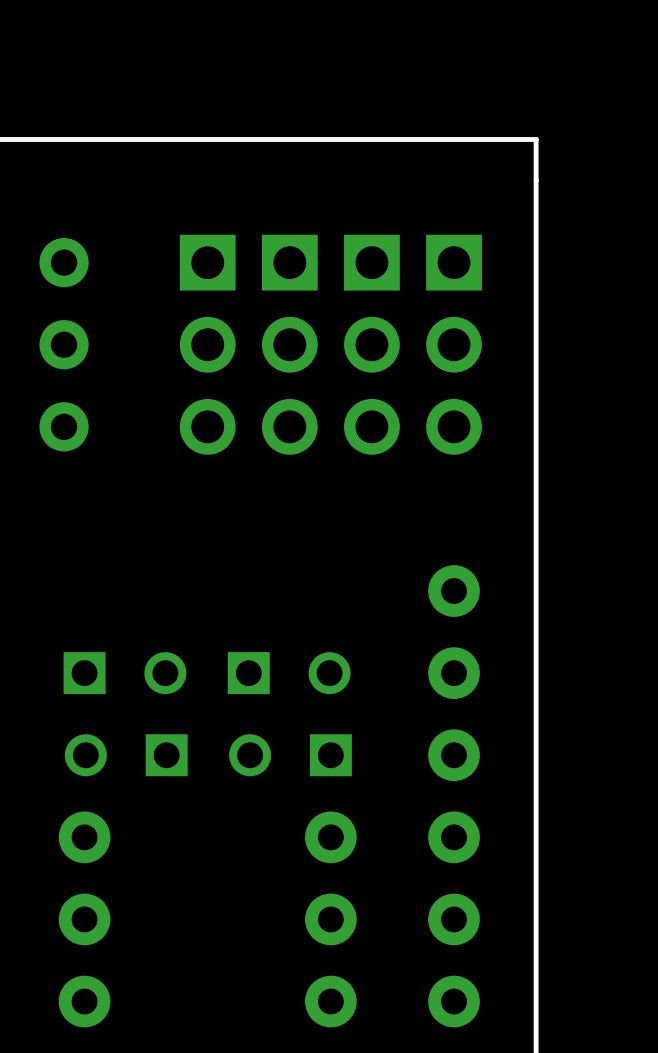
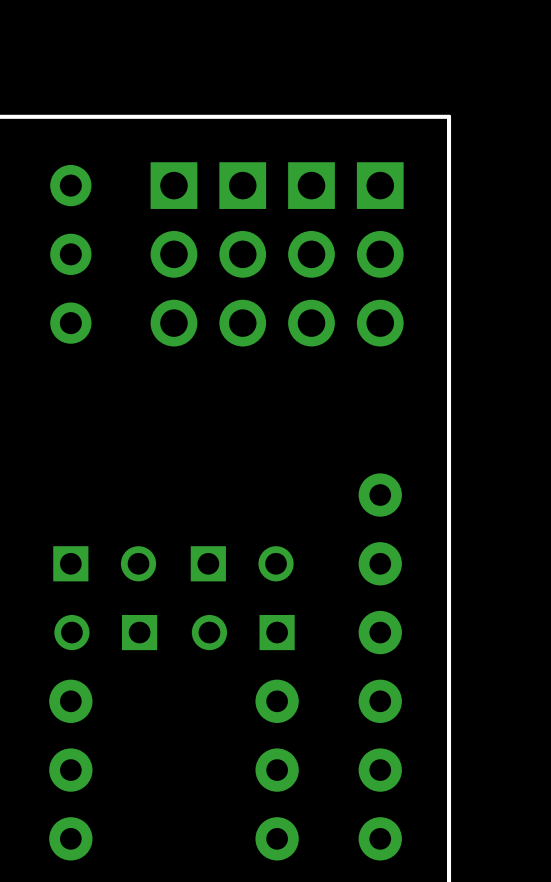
part position: (64, 344) -> (70, 254)
part position: (207, 344) -> (173, 254)
part position: (289, 344) -> (242, 254)
part position: (371, 344) -> (311, 254)
part position: (454, 344) -> (380, 254)

